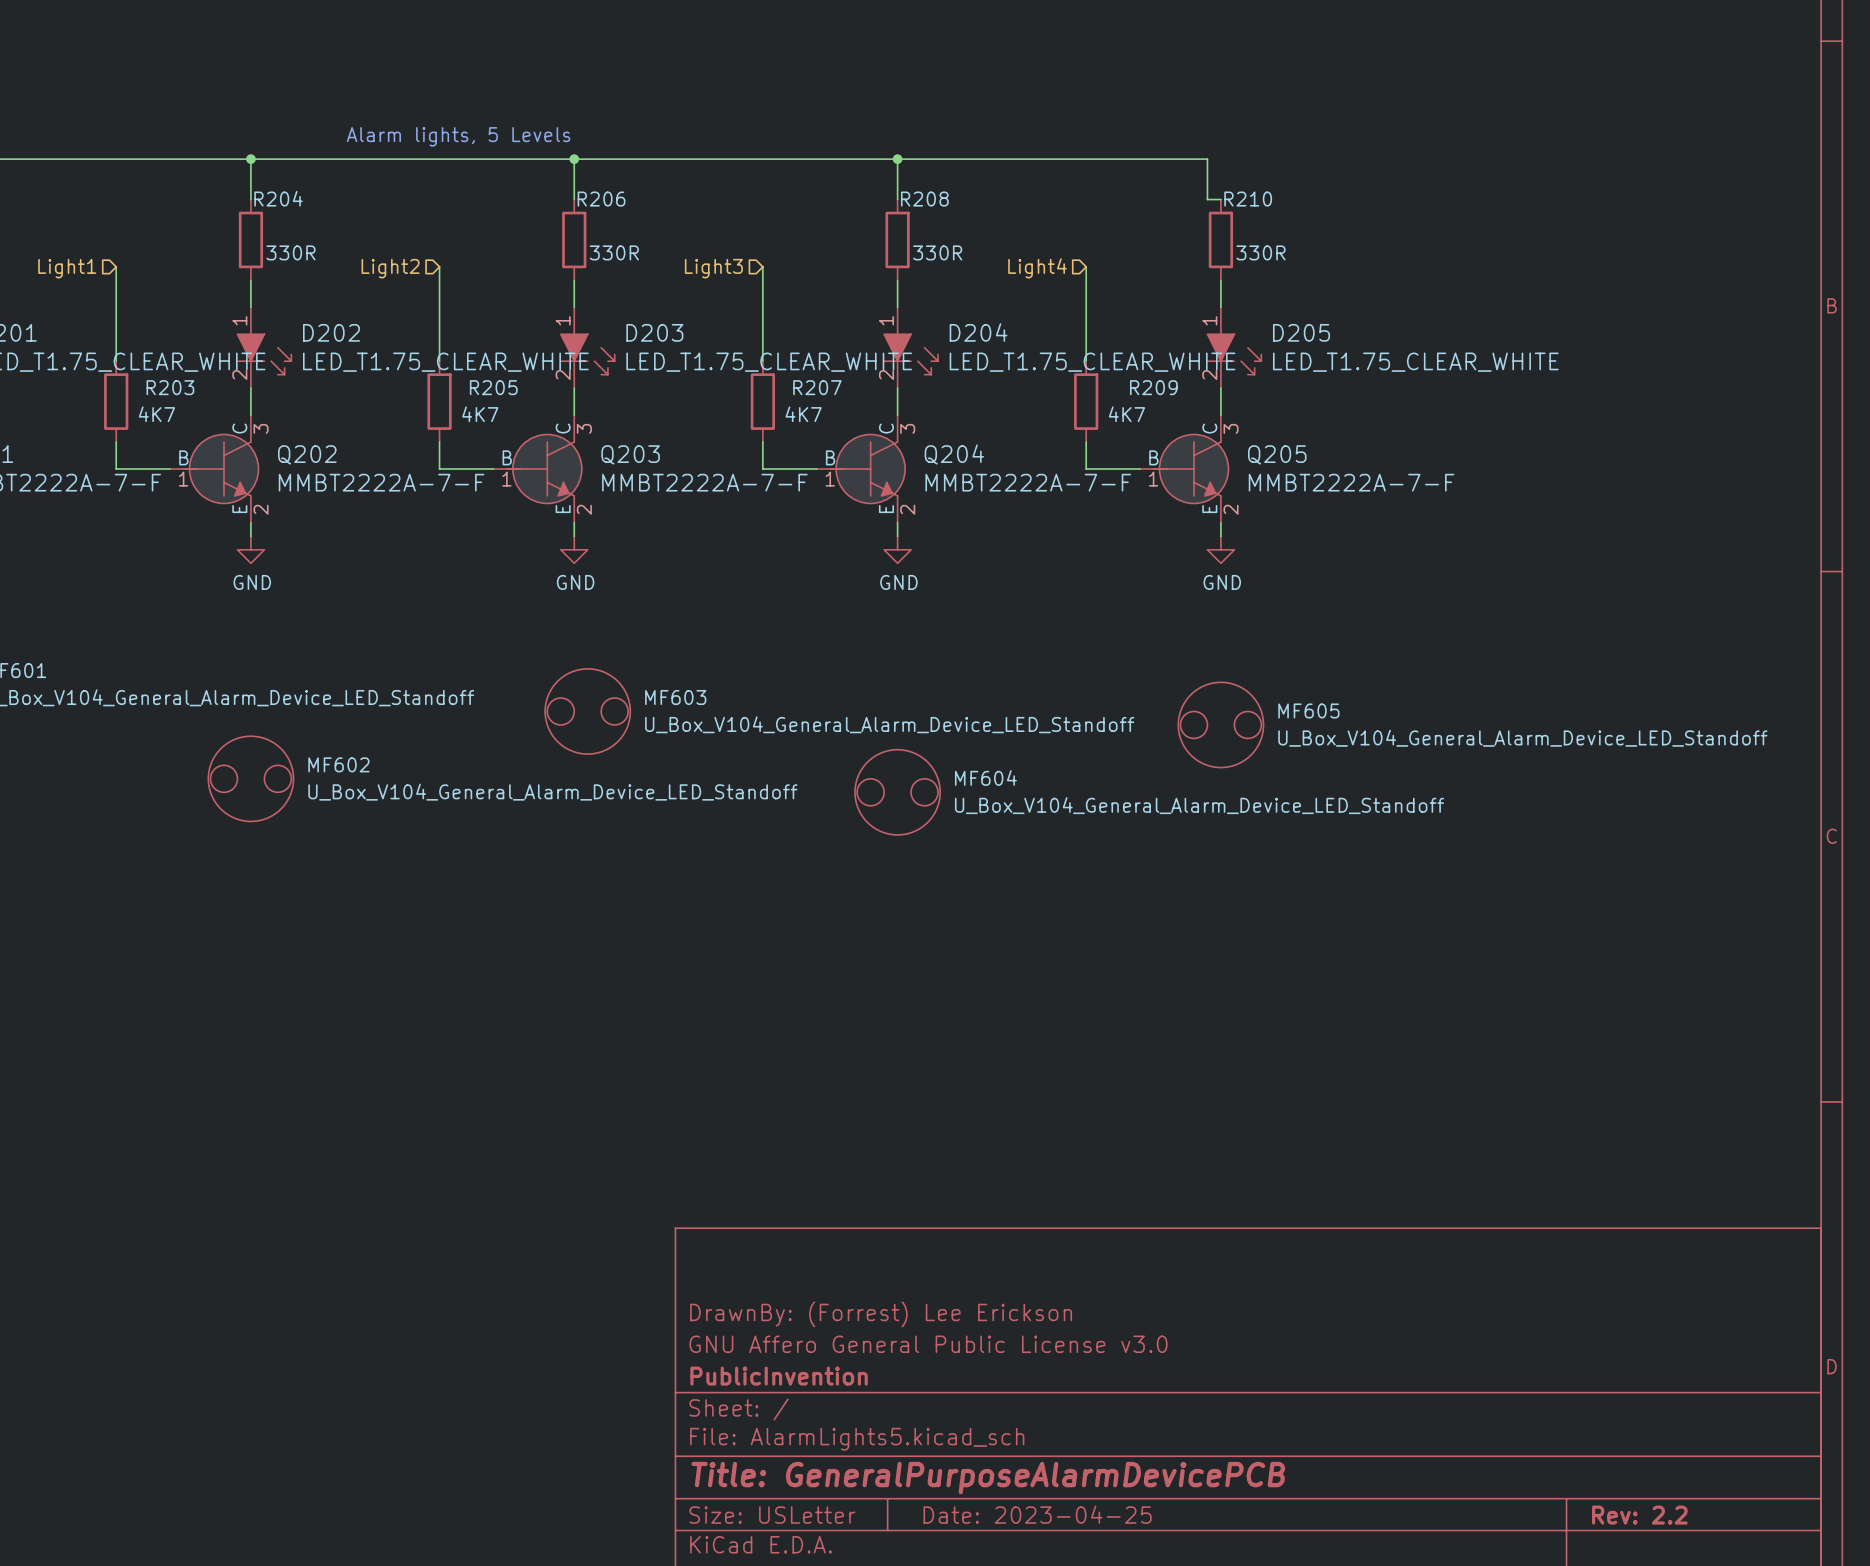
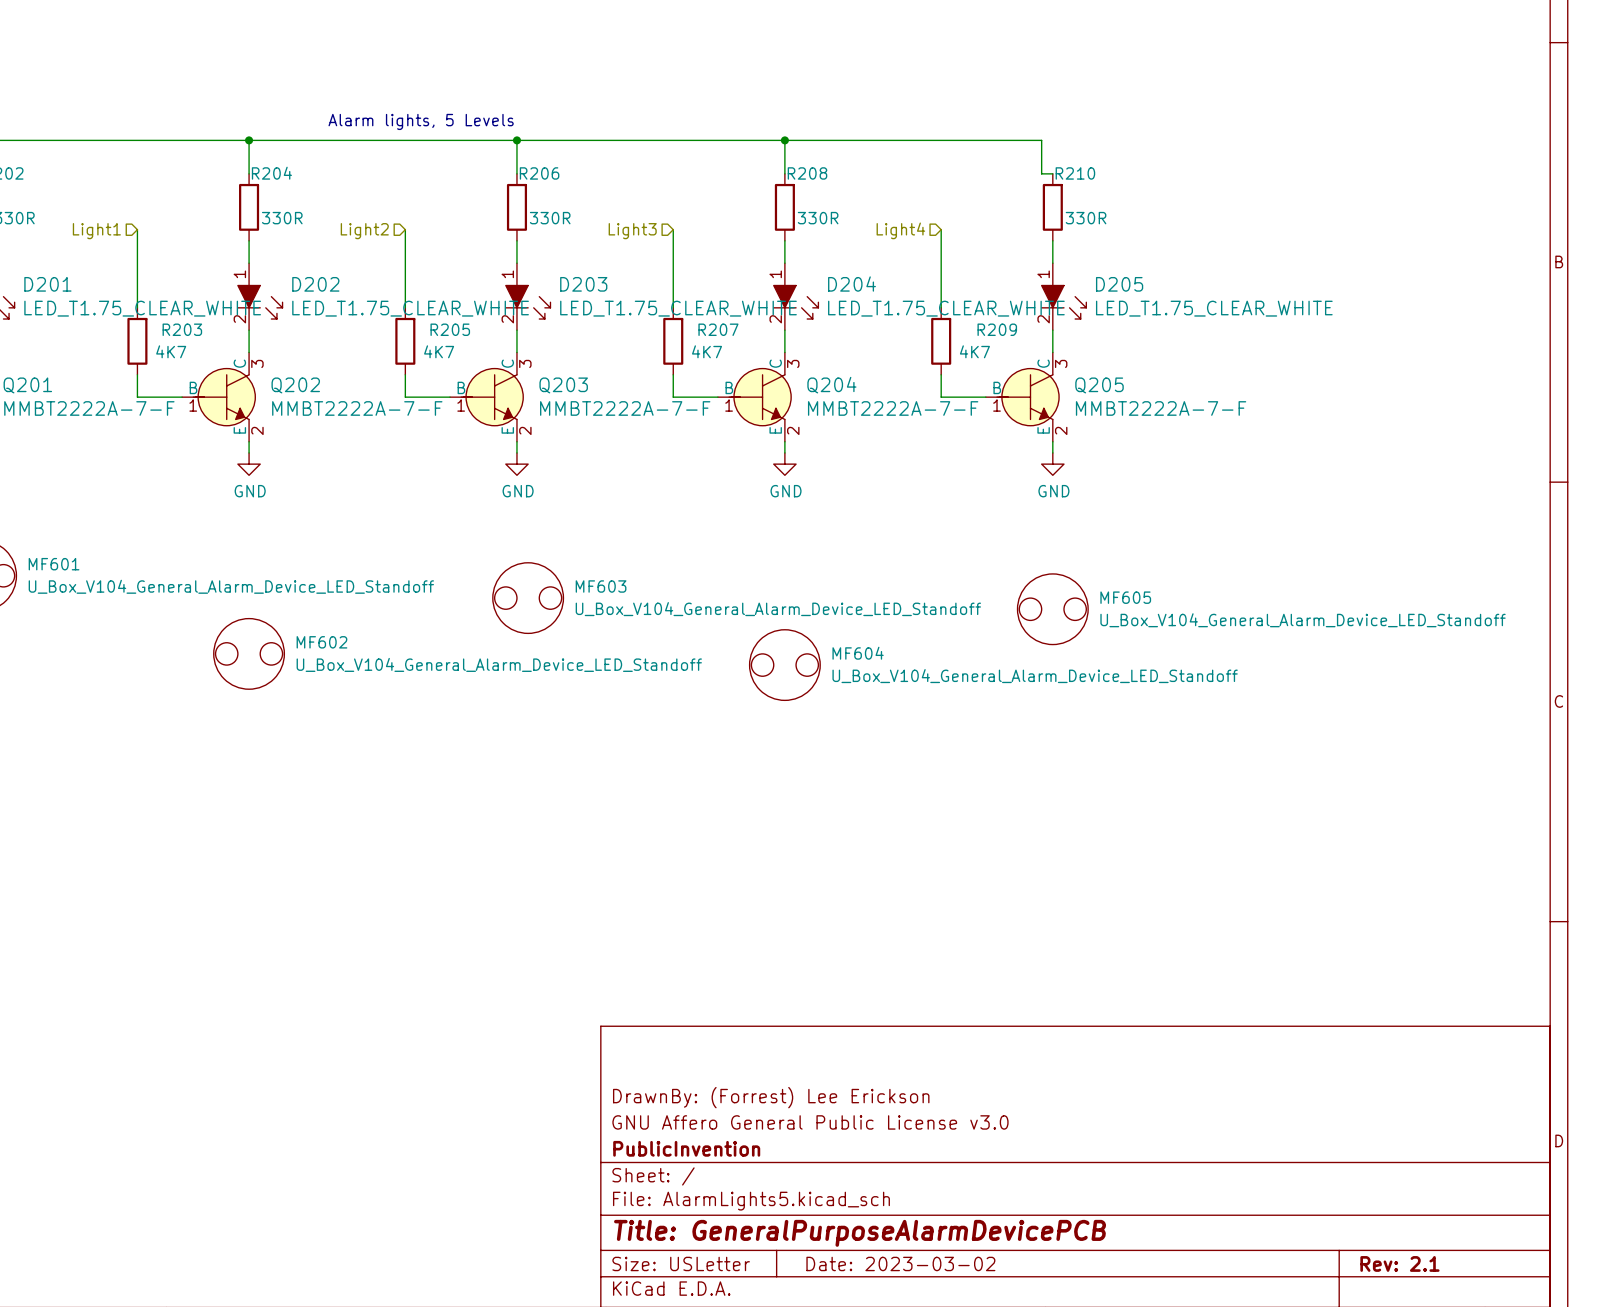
title block: Date: 2023-04-25 (1037, 1514) -> Date: 2023-03-02 (900, 1263)
title block: Rev: 2.2 (1639, 1515) -> Rev: 2.1 (1399, 1263)

